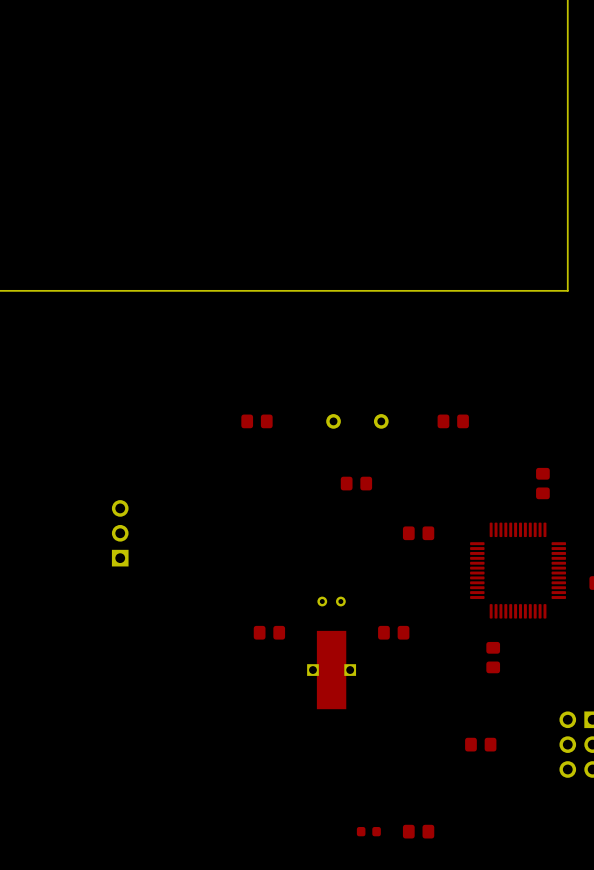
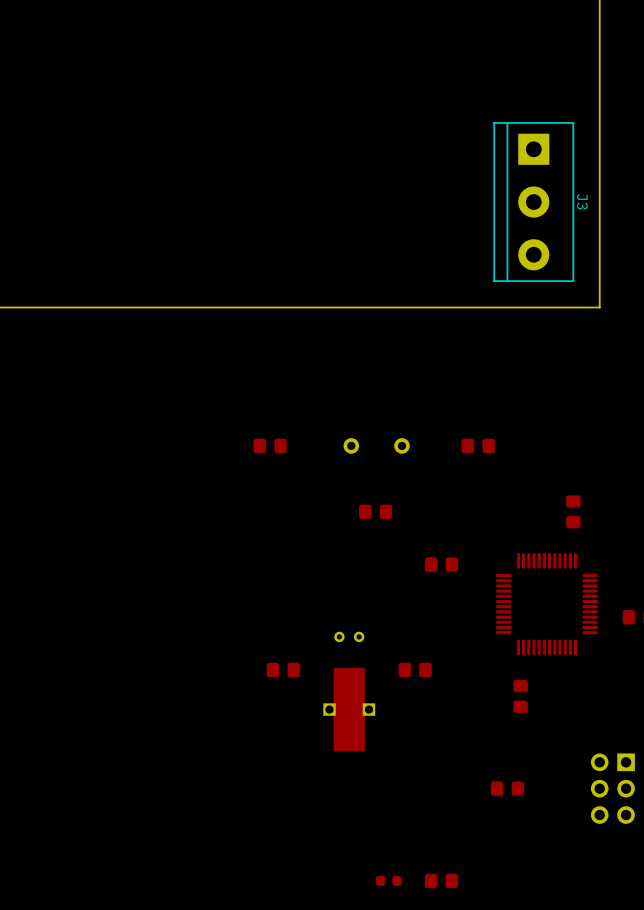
J3: none -> (533, 202)
part: (120, 533) -> none

